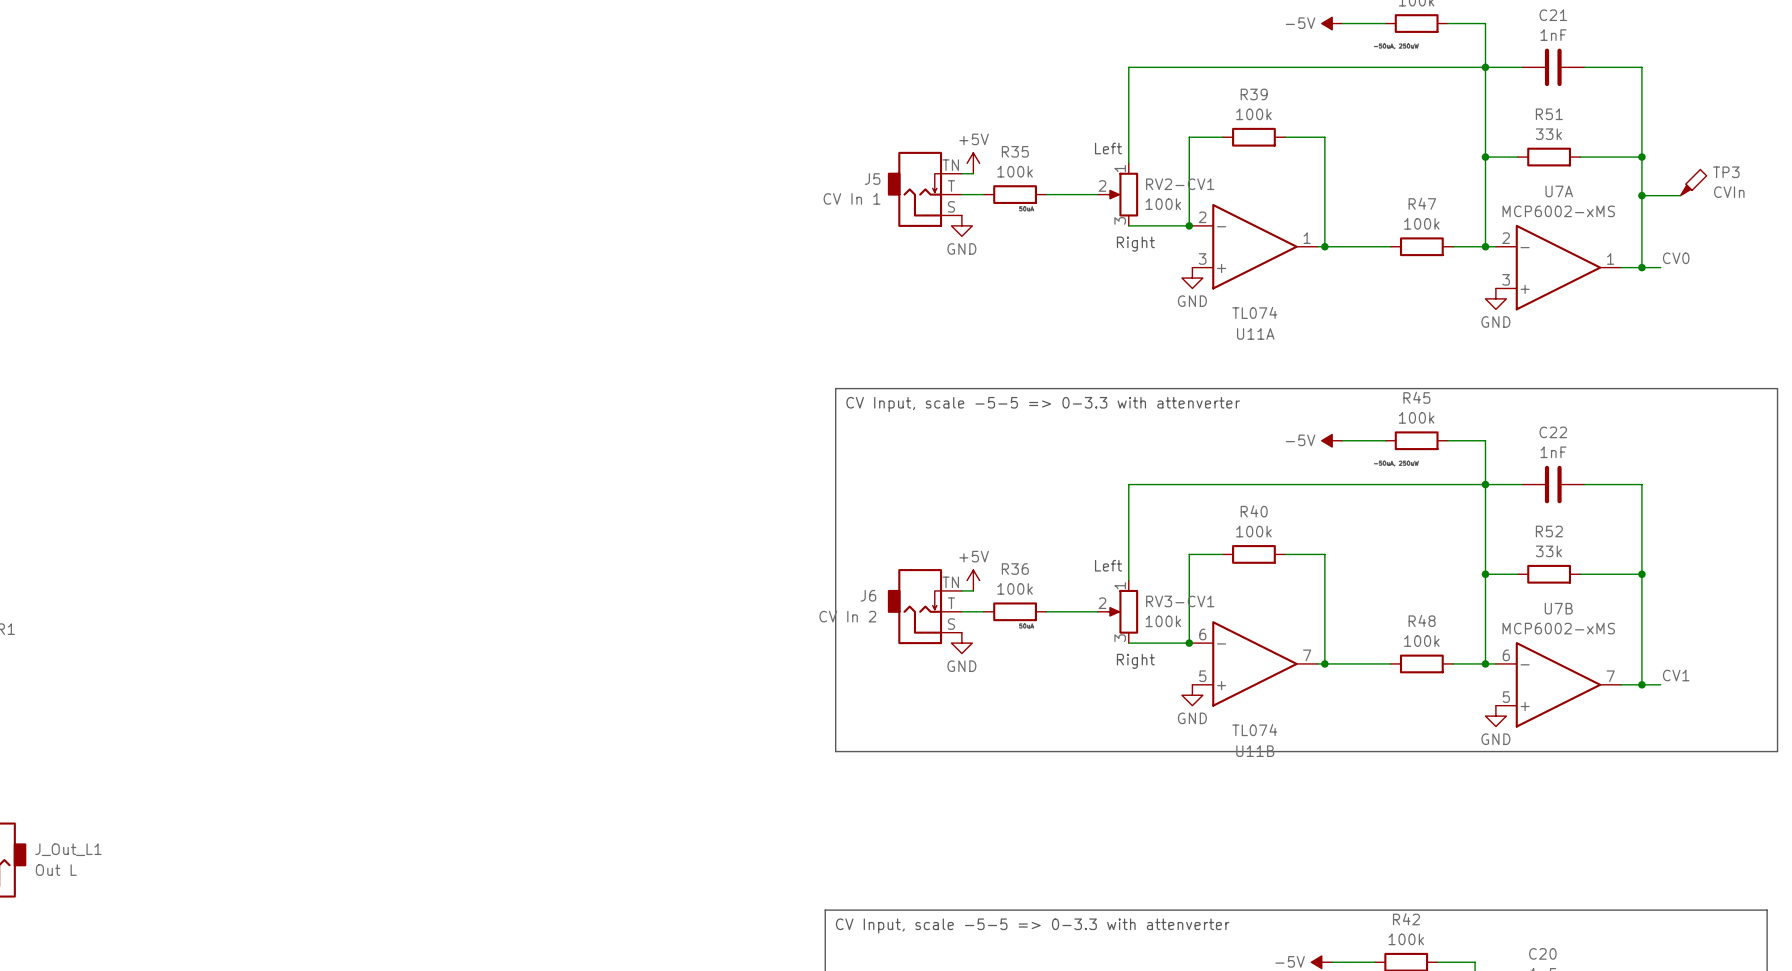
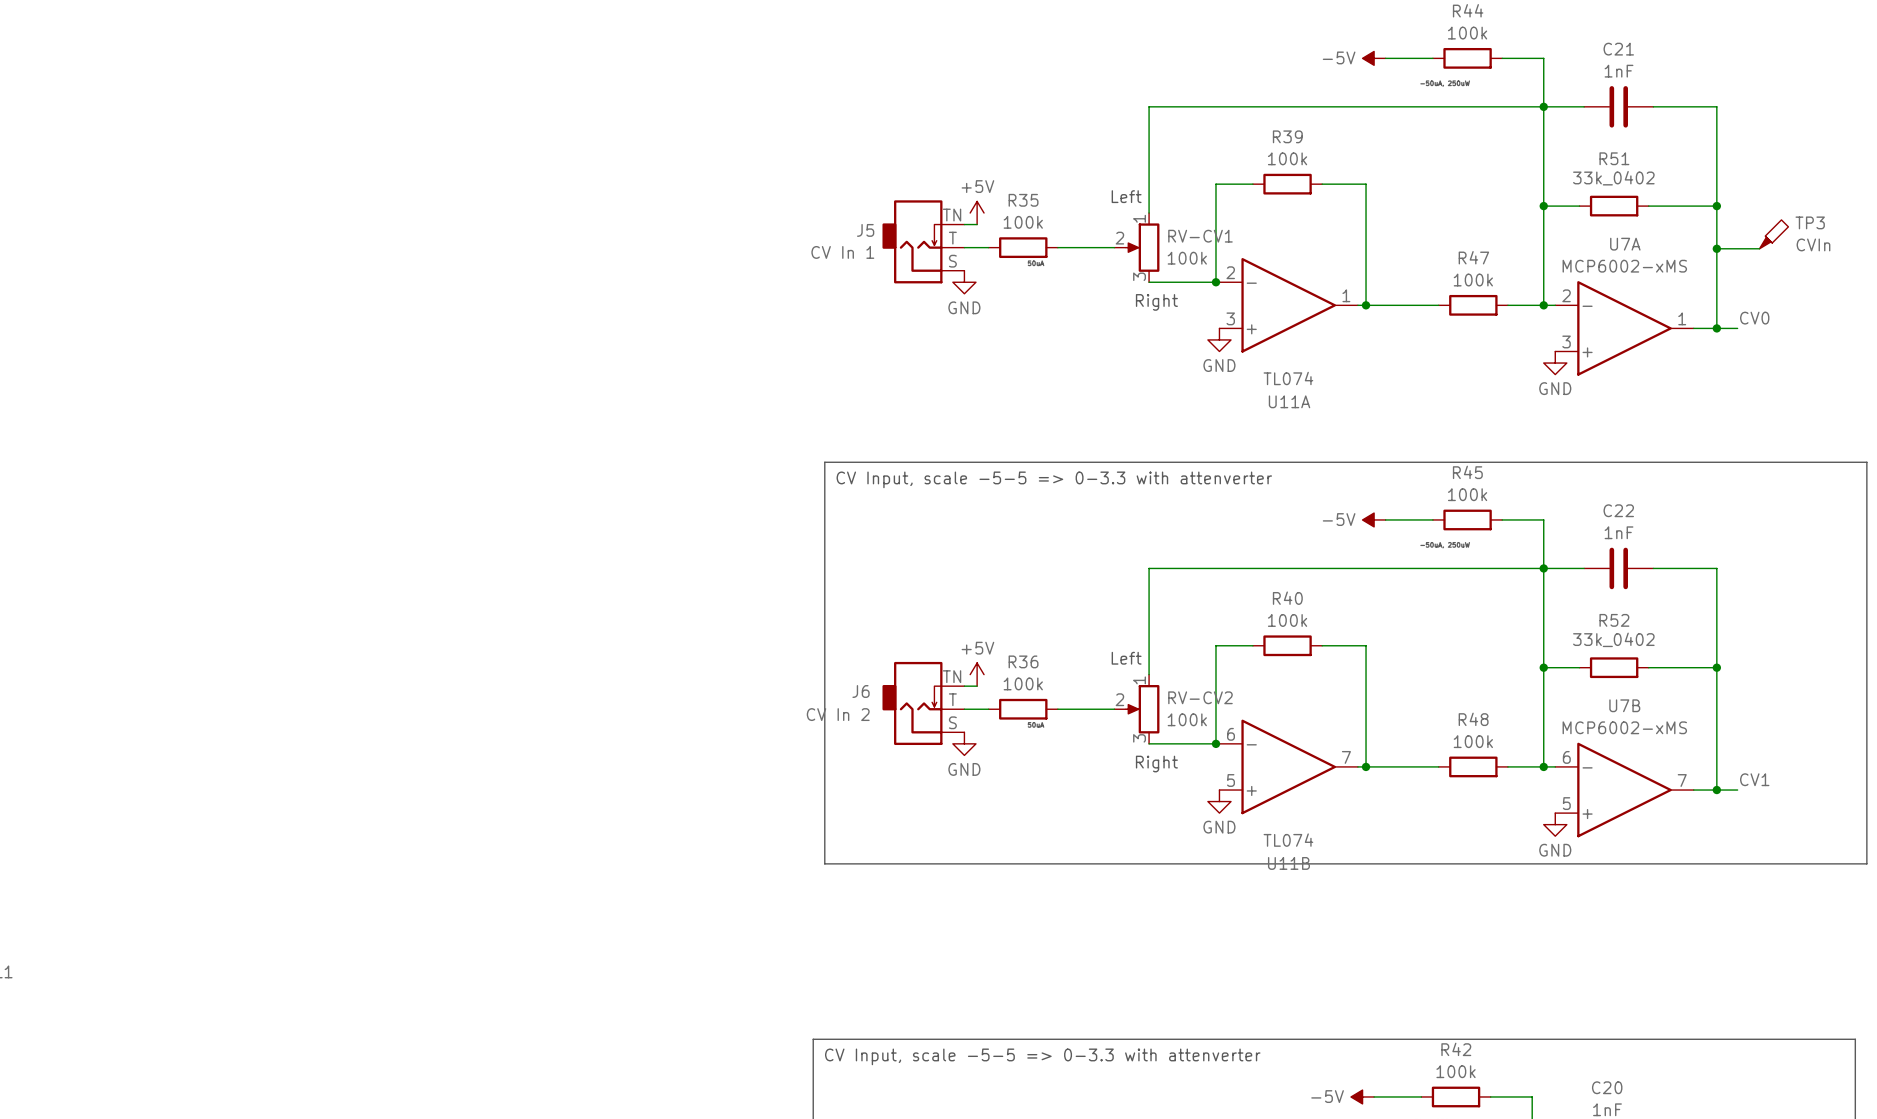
R51 value: 33k (1548, 134) -> 33k_0402 (1613, 178)
RV2-CV1 name: RV2-CV1 (1180, 184) -> RV-CV1 (1200, 236)
R52 value: 33k (1548, 551) -> 33k_0402 (1613, 639)
RV3-CV1 name: RV3-CV1 (1180, 601) -> RV-CV2 (1200, 697)

